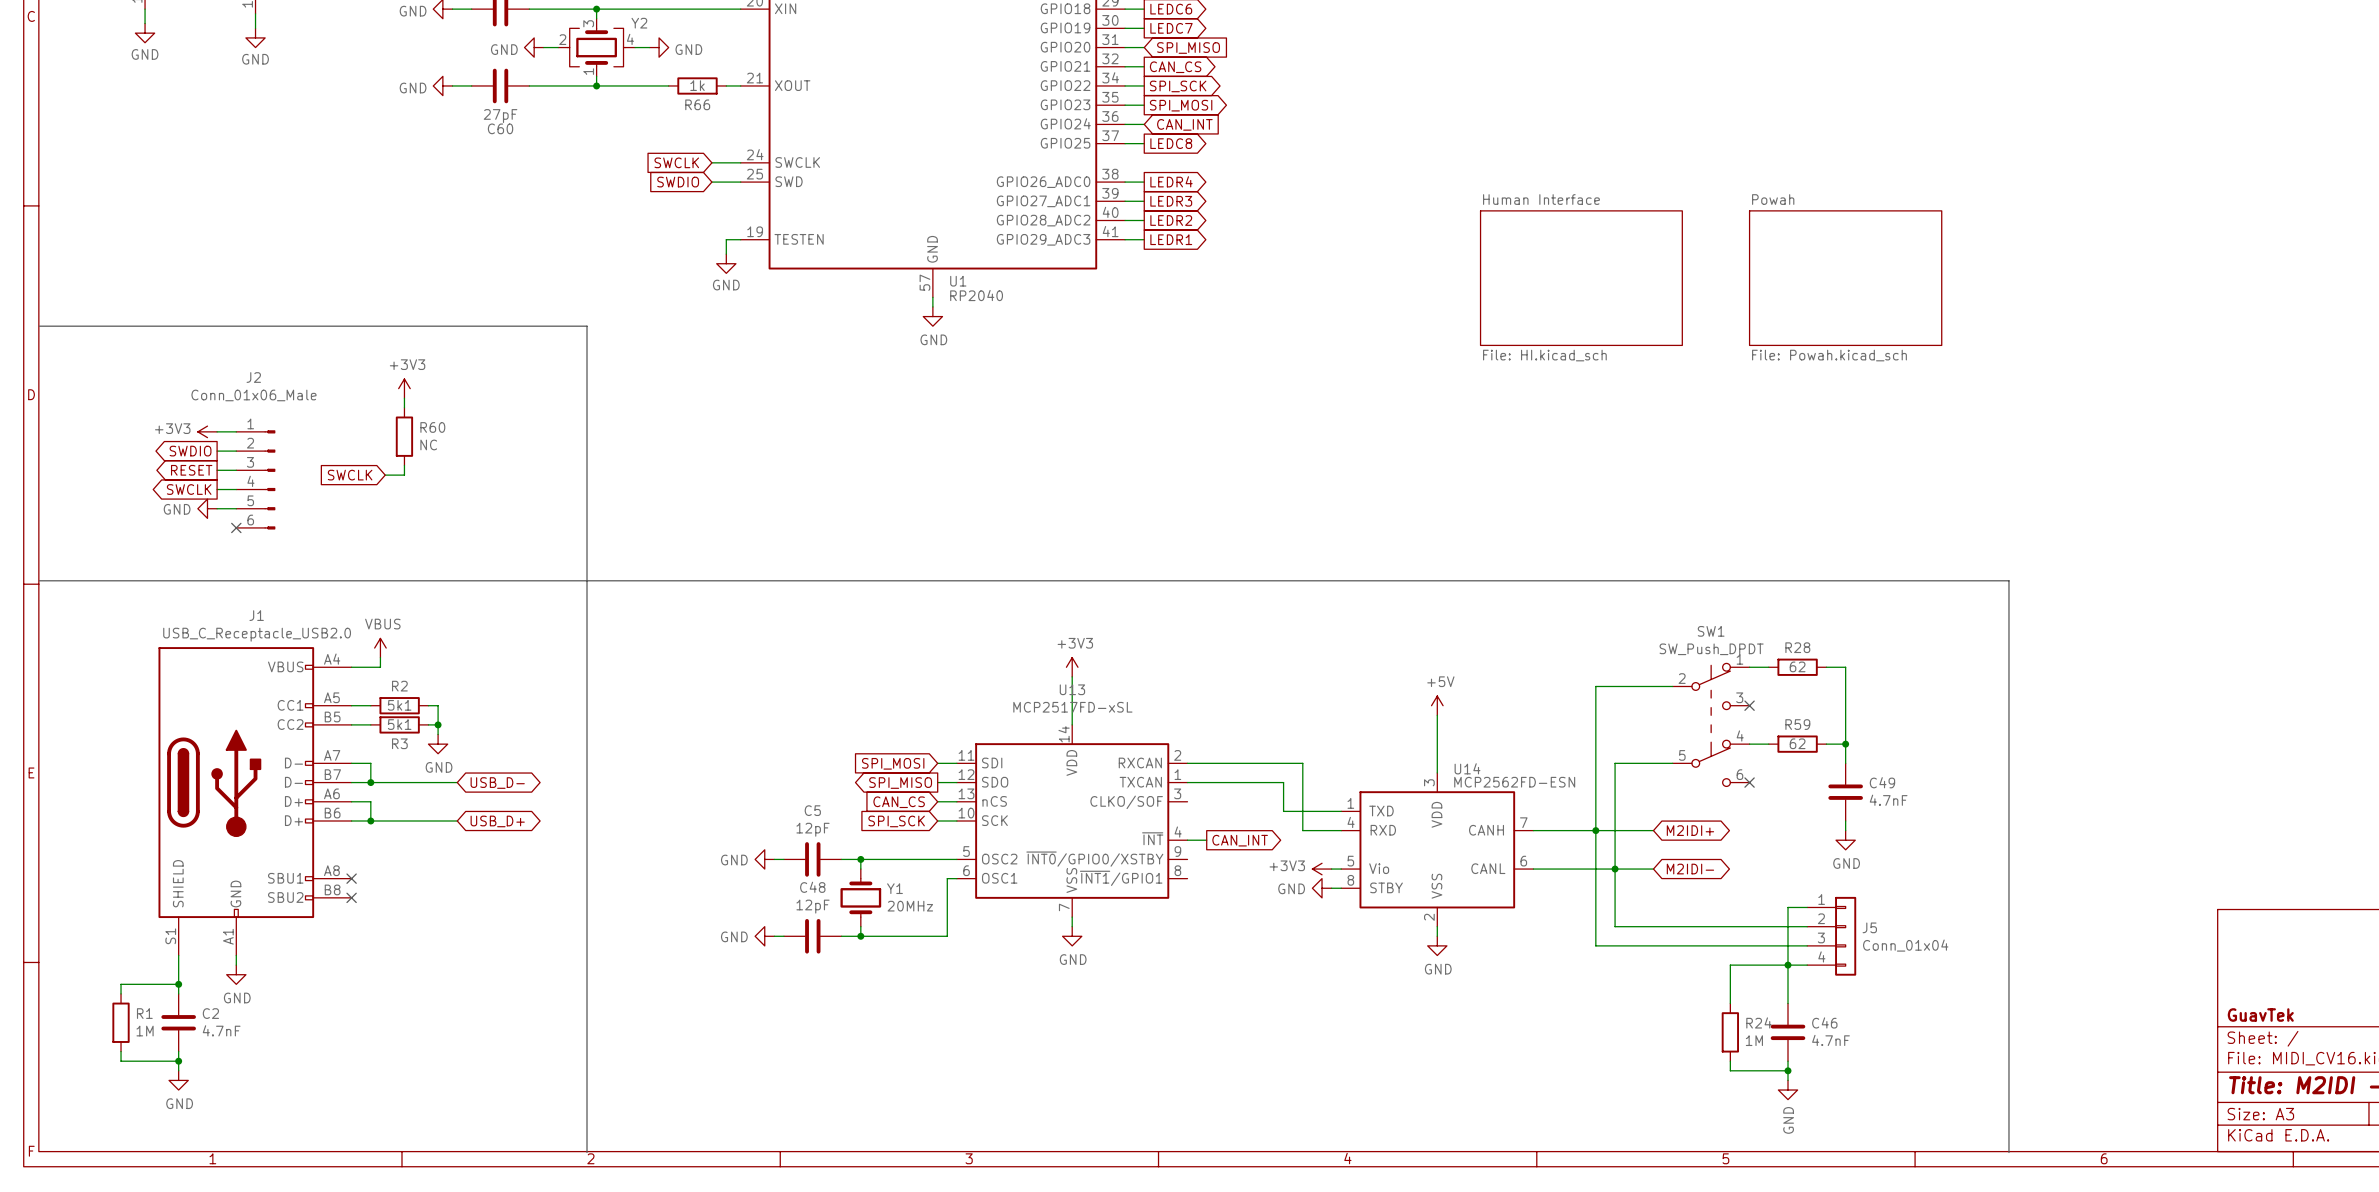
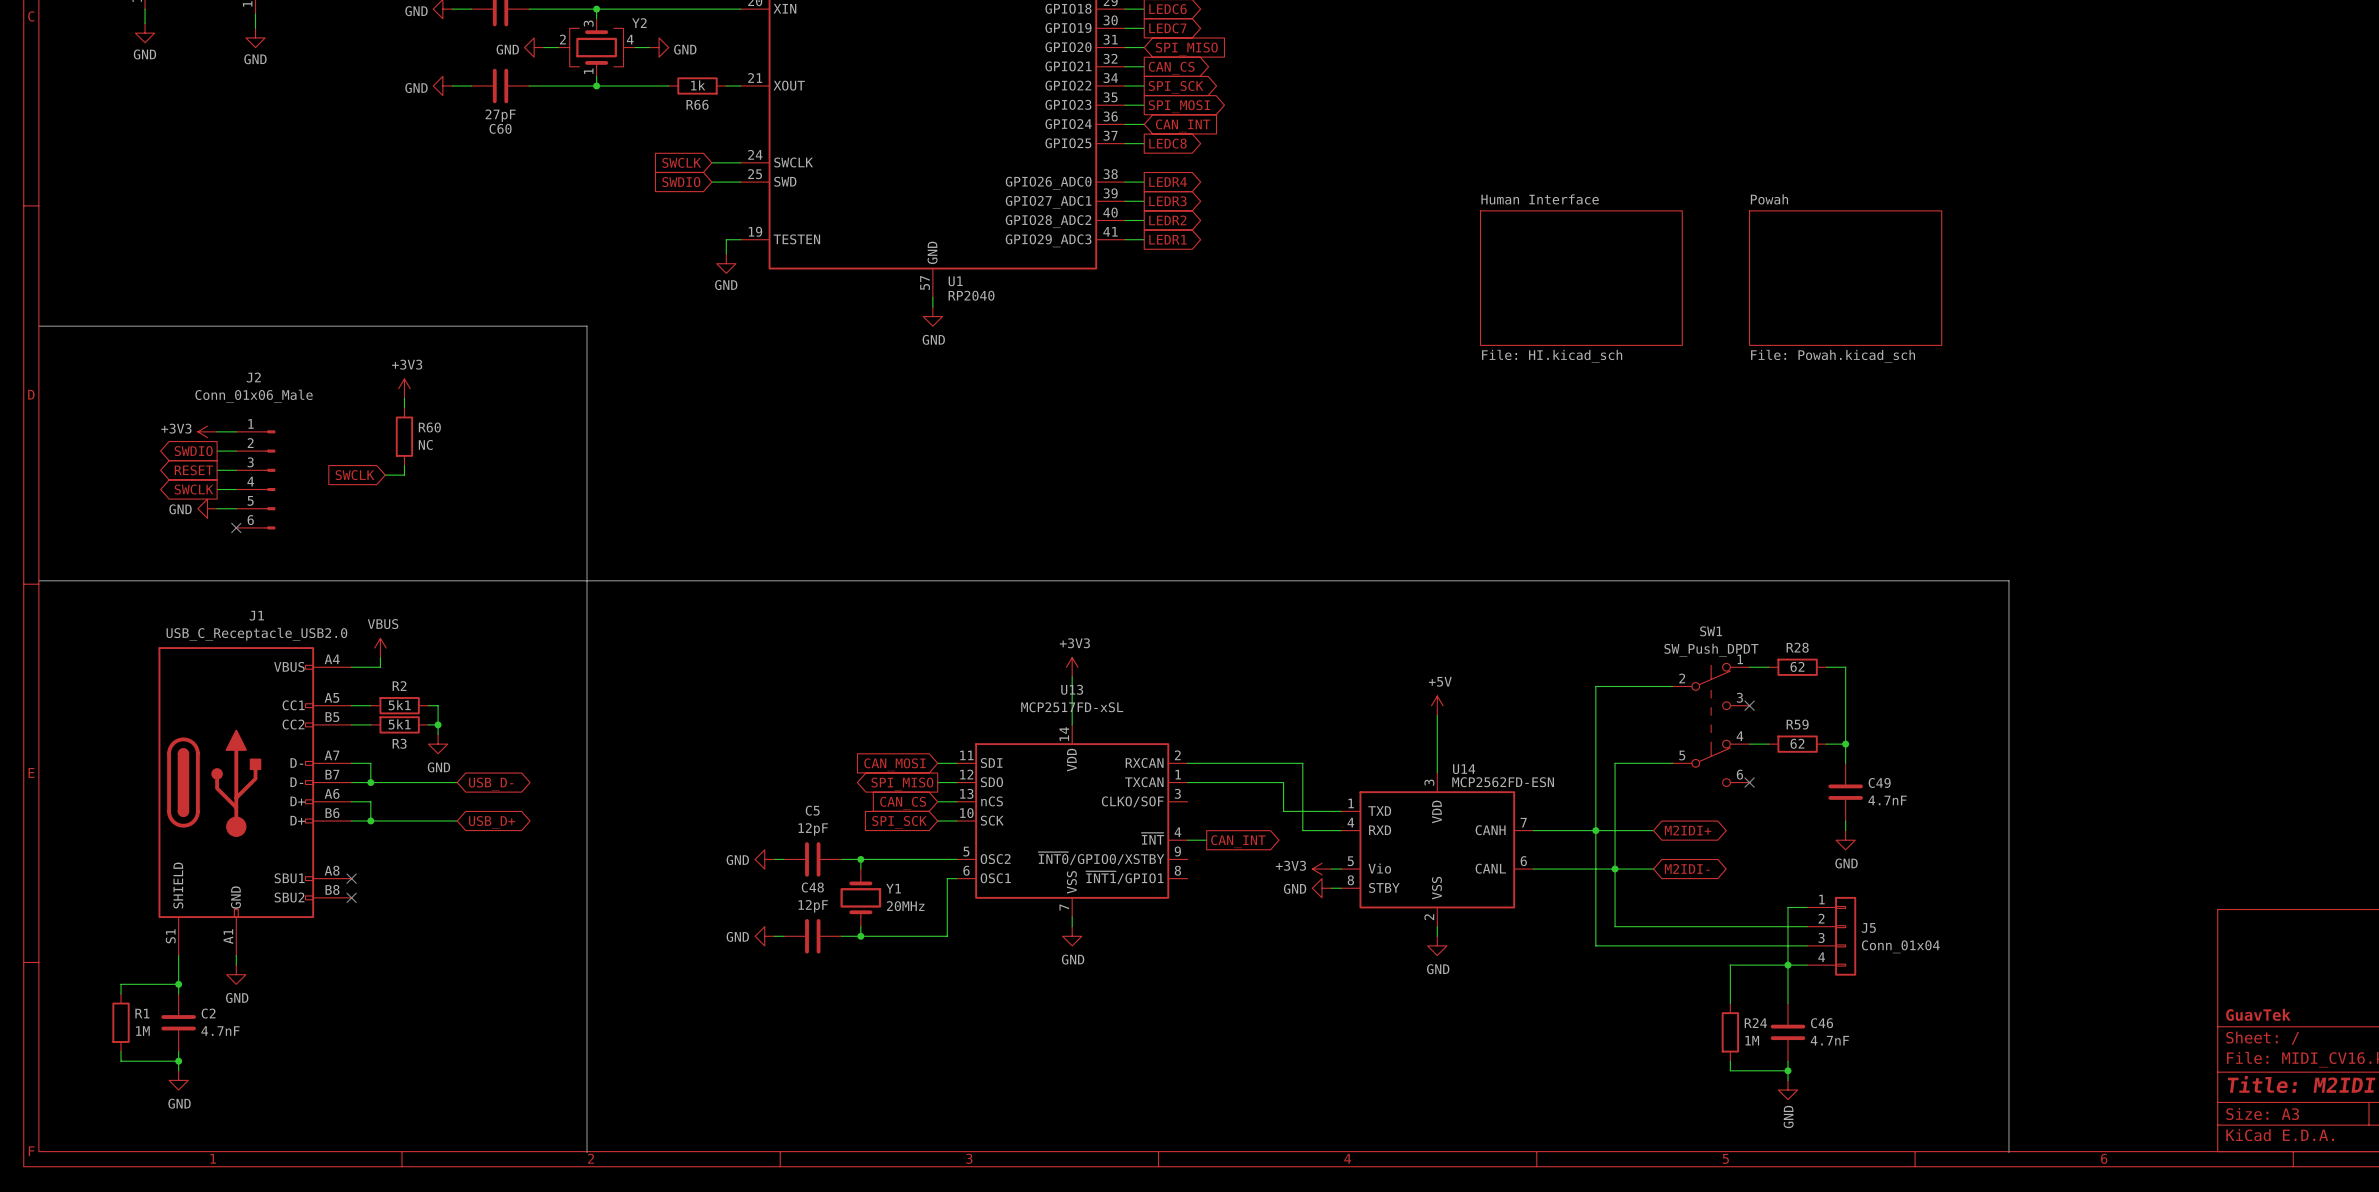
global label: SPI_MOSI (893, 763) -> CAN_MOSI (894, 764)

